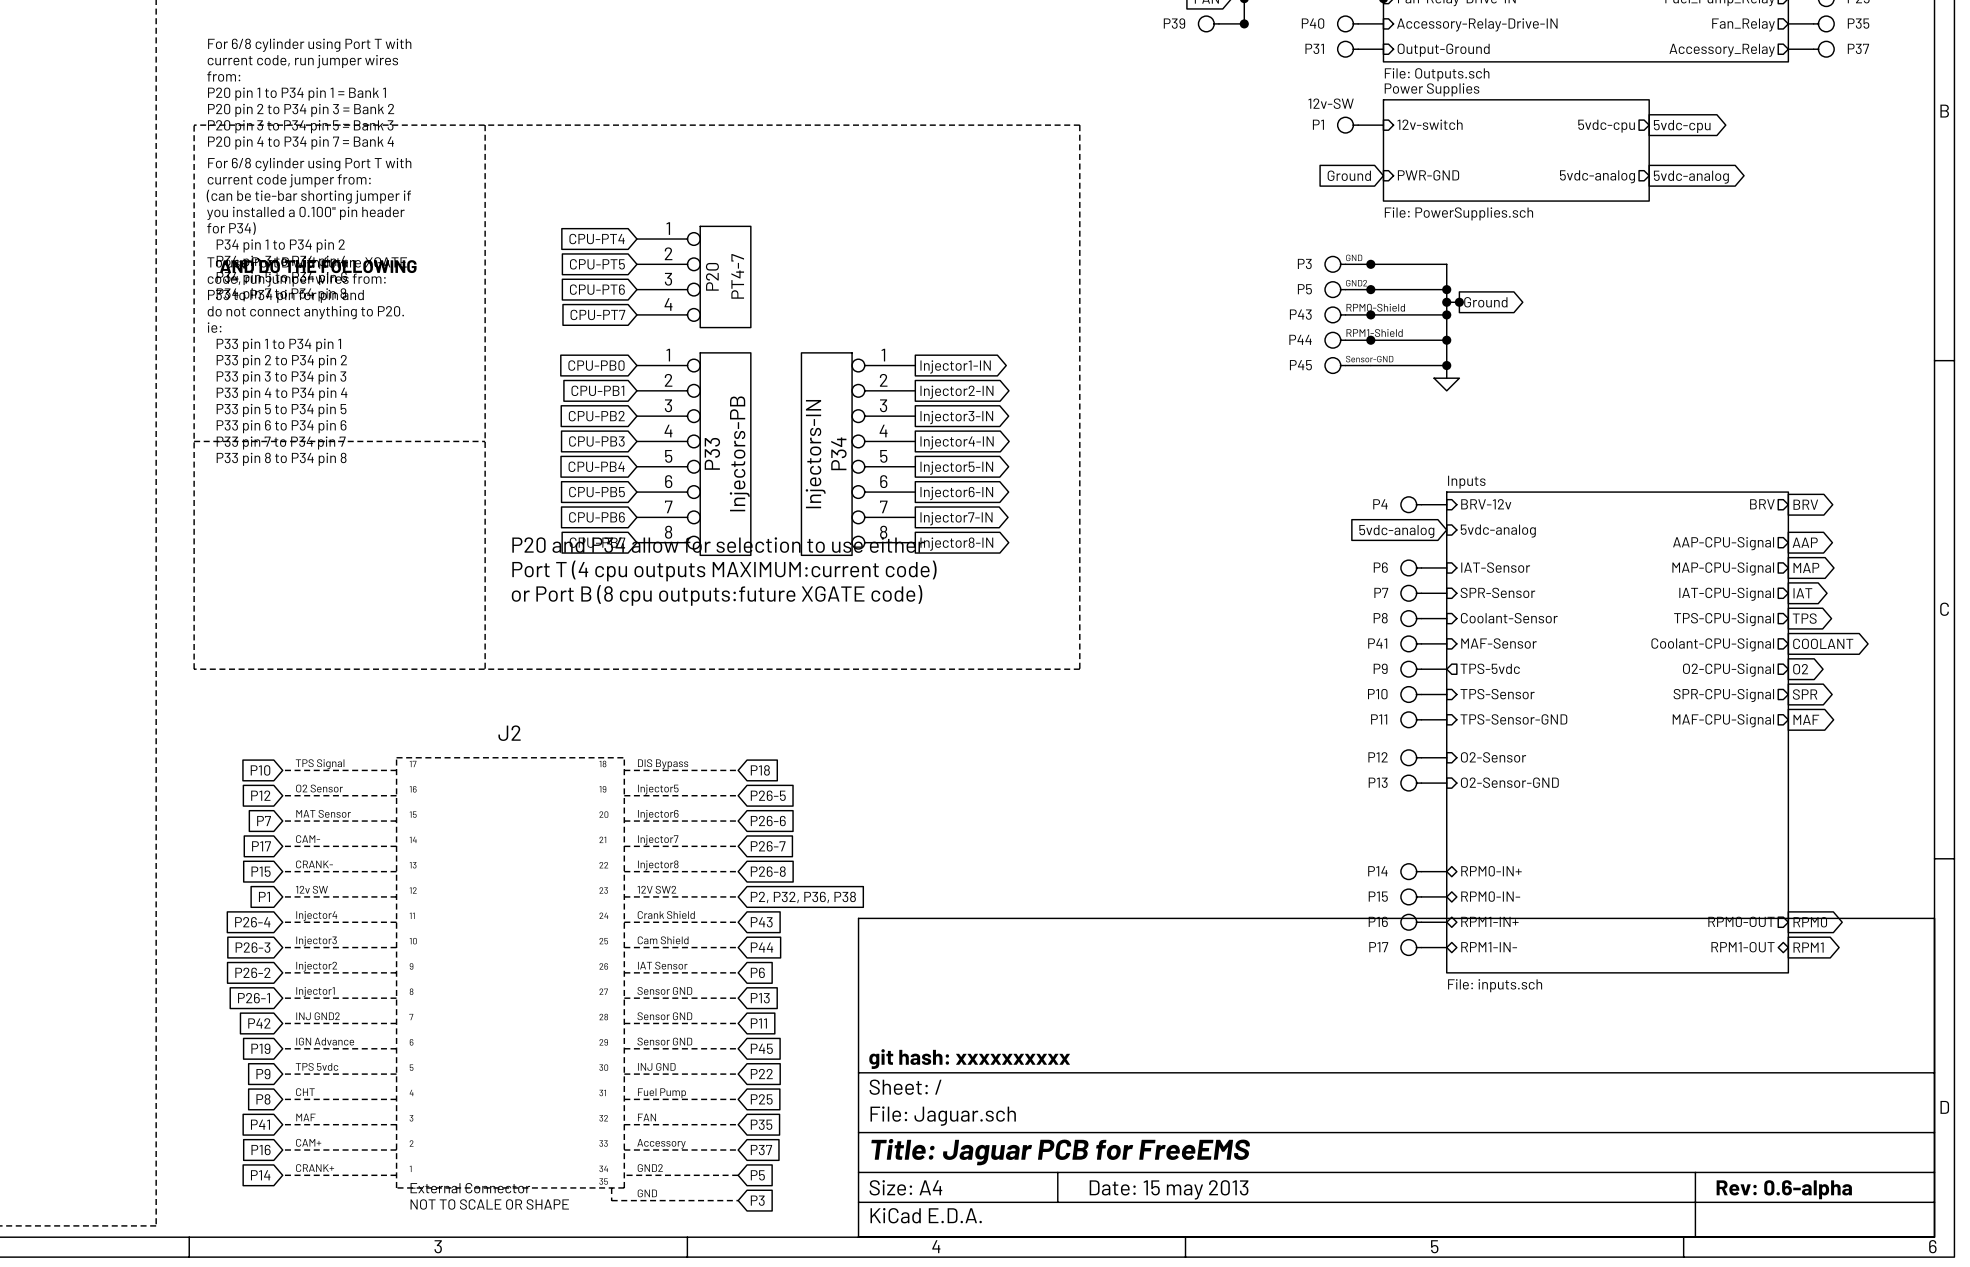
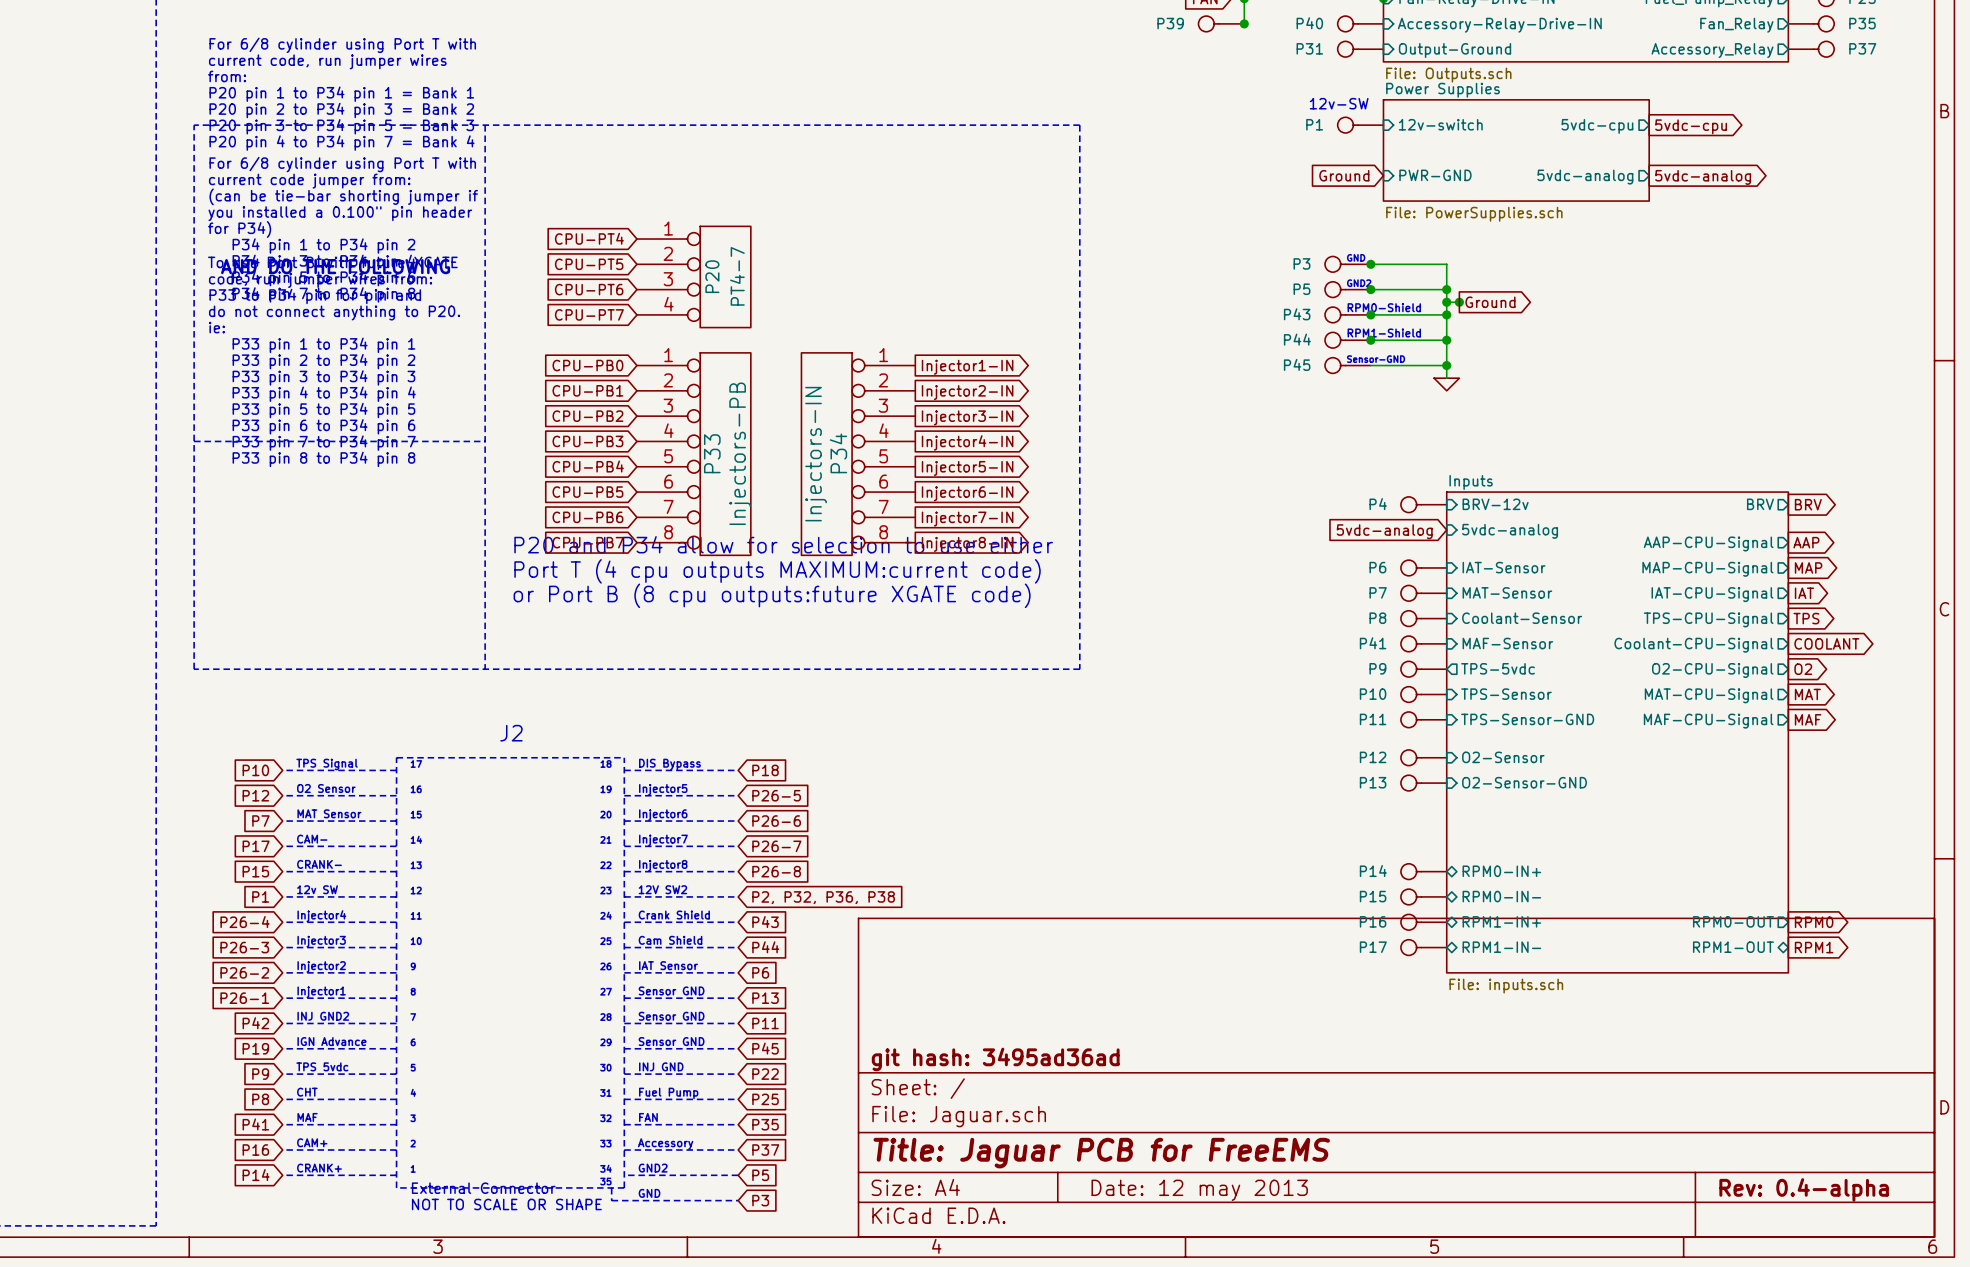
sheet pin: SPR-Sensor (1497, 592) -> MAT-Sensor (1507, 592)
global label: SPR (1805, 694) -> MAT (1807, 694)
sheet pin: SPR-CPU-Signal (1723, 695) -> MAT-CPU-Signal (1709, 695)
title block: git hash: xxxxxxxxxx (969, 1059) -> git hash: 3495ad36ad (995, 1059)
title block: Date: 15 may 2013 (1169, 1189) -> Date: 12 may 2013 (1199, 1190)
title block: Rev: 0.6-alpha (1784, 1189) -> Rev: 0.4-alpha (1804, 1189)

